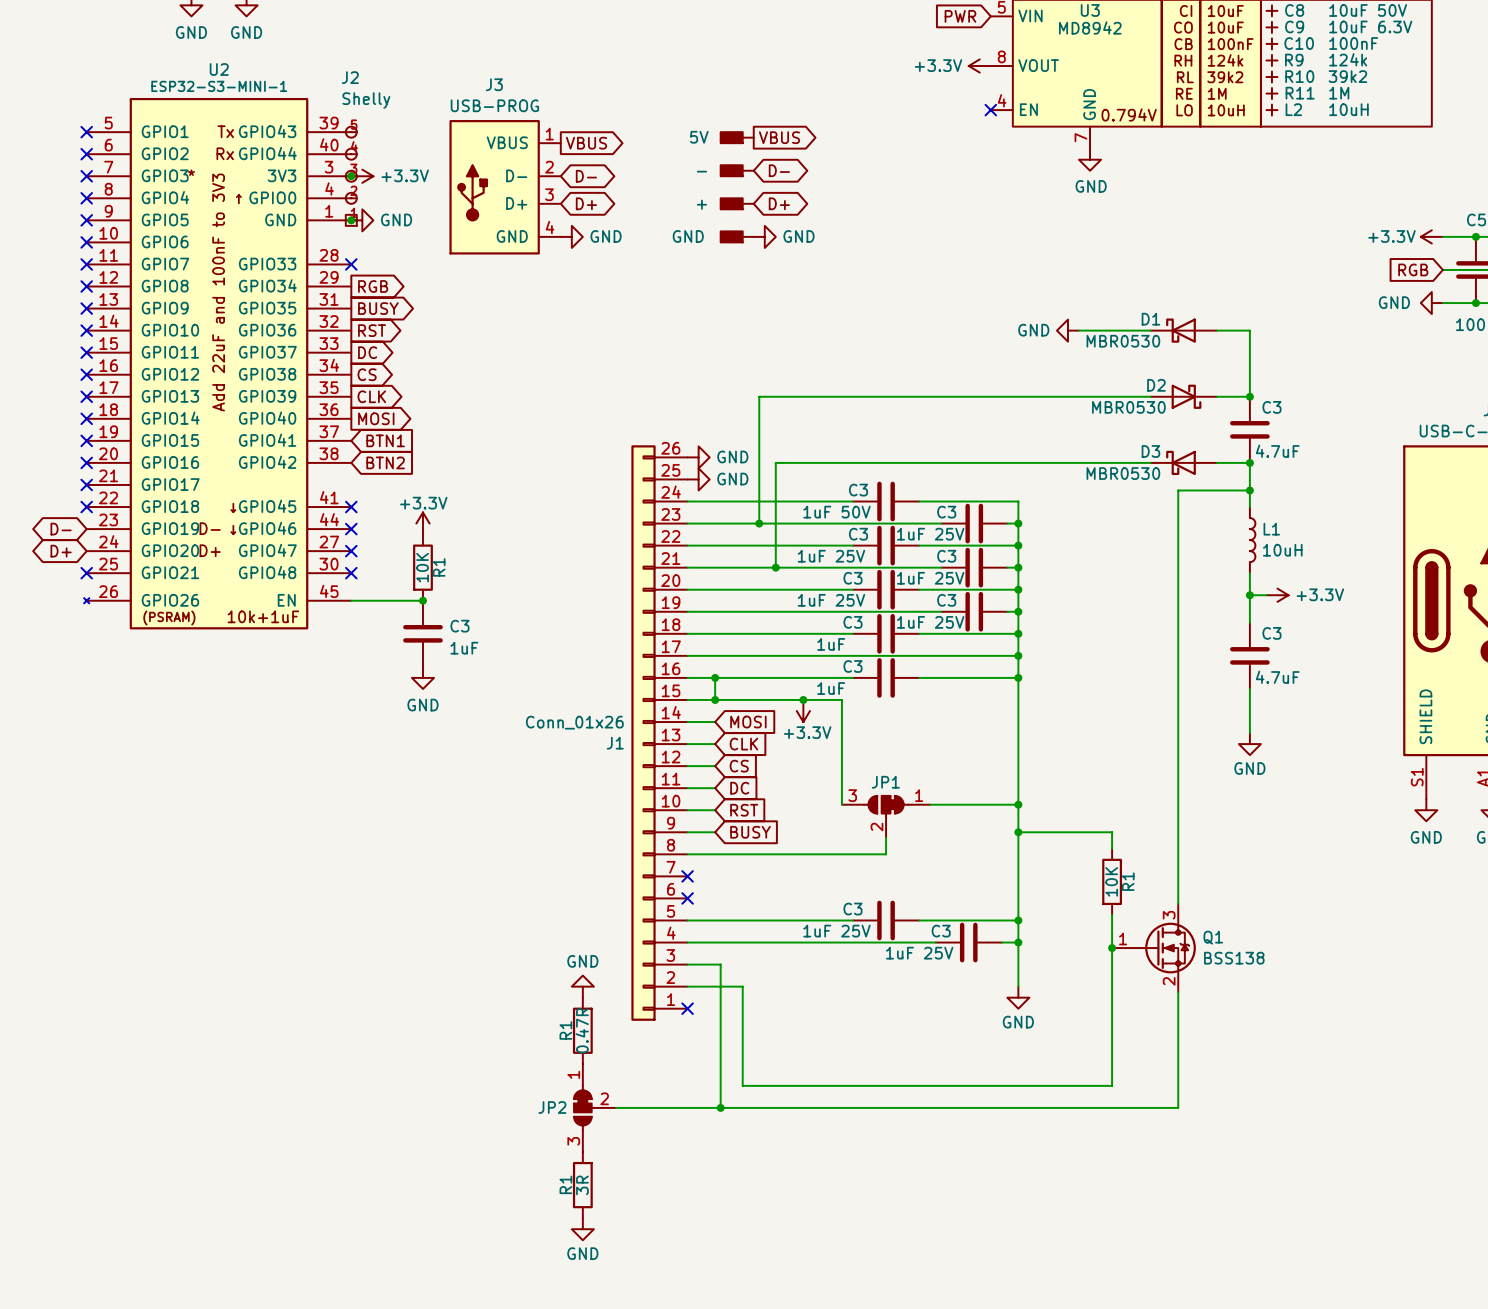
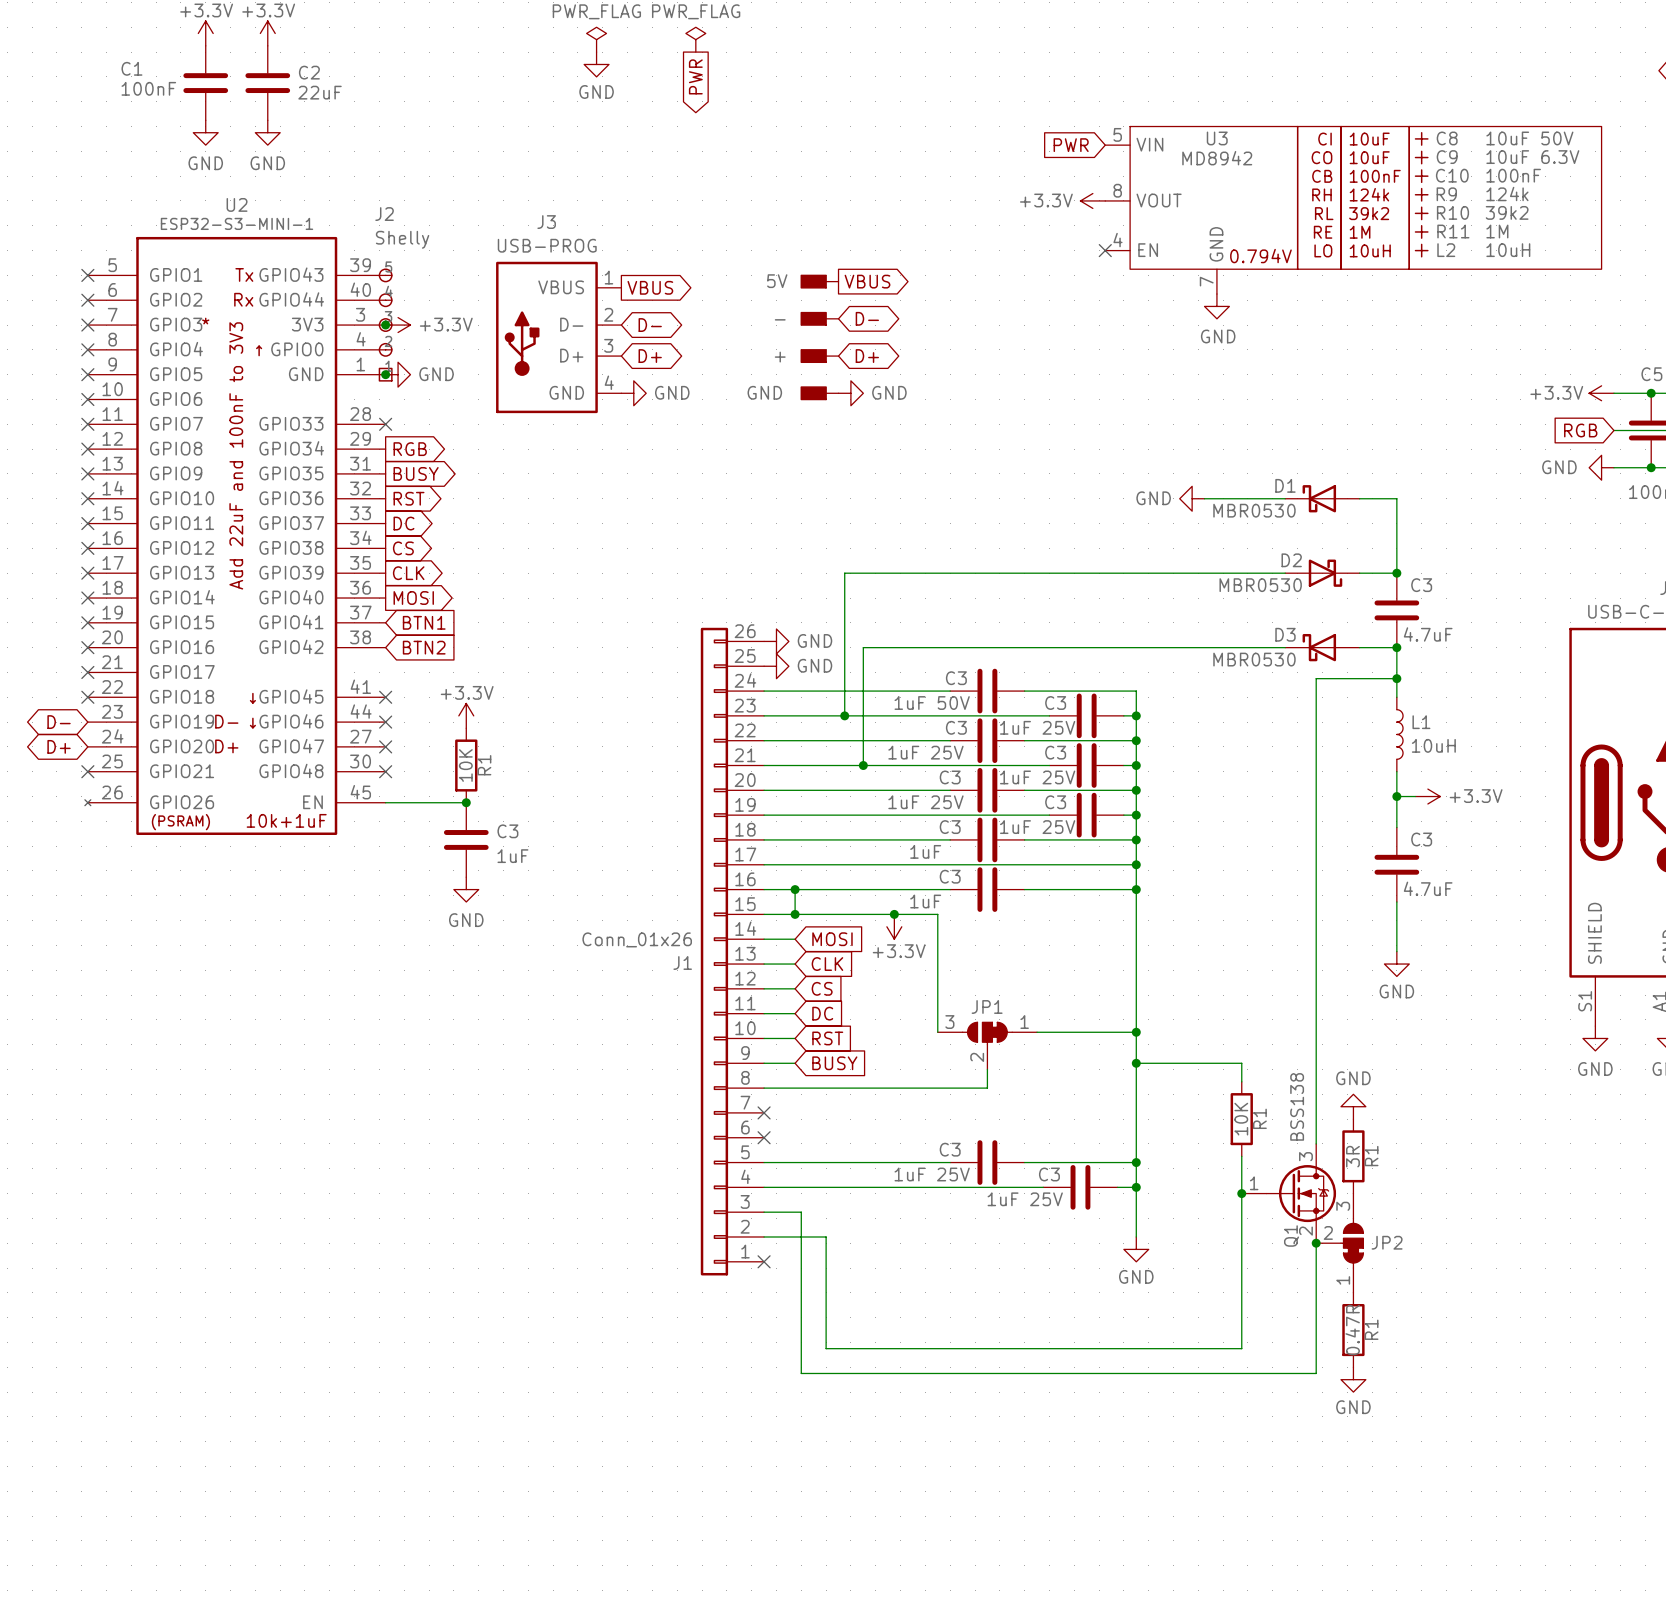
power symbol: none -> GND (1353, 1106)
R1: none -> 3R (1353, 1156)
Q1 name rotation: 0° (1213, 937) -> 90° counterclockwise (1291, 1236)
Q1 name position: Q1 (1213, 937) -> Q1 (1291, 1236)
Q1 value rotation: 0° (1234, 958) -> 90° counterclockwise (1297, 1106)
Q1 value position: BSS138 (1234, 958) -> BSS138 (1297, 1106)
power symbol: GND (582, 986) -> none
junction: none -> (1316, 1243)
R1: 0.47R (582, 1030) -> none
R1: none -> 0.47R (1353, 1330)
JP2 rotation: 0° (583, 1107) -> 180° (1352, 1243)
JP2 position: (594, 1107) -> (1339, 1243)
wire: (615, 1107) (720, 1107) -> none
junction: (720, 1107) -> none
power symbol: none -> GND (1353, 1379)
R1: 3R (582, 1185) -> none
power symbol: GND (582, 1229) -> none

